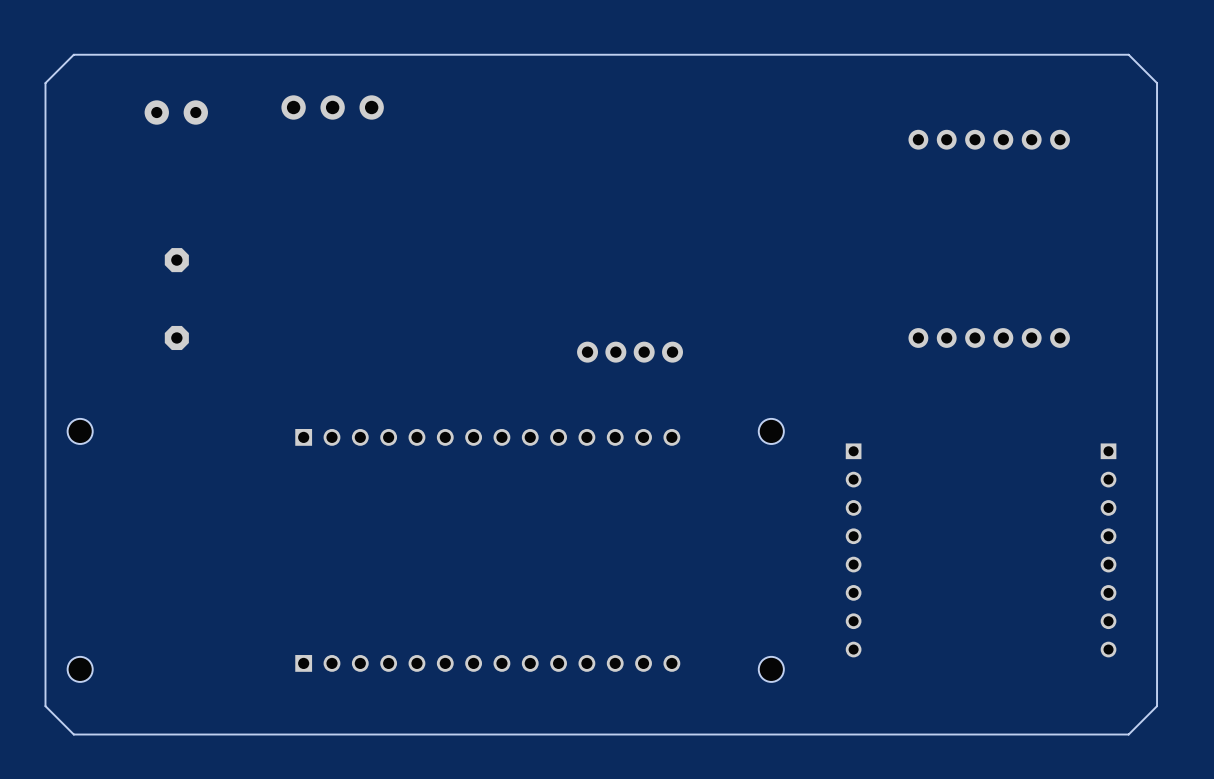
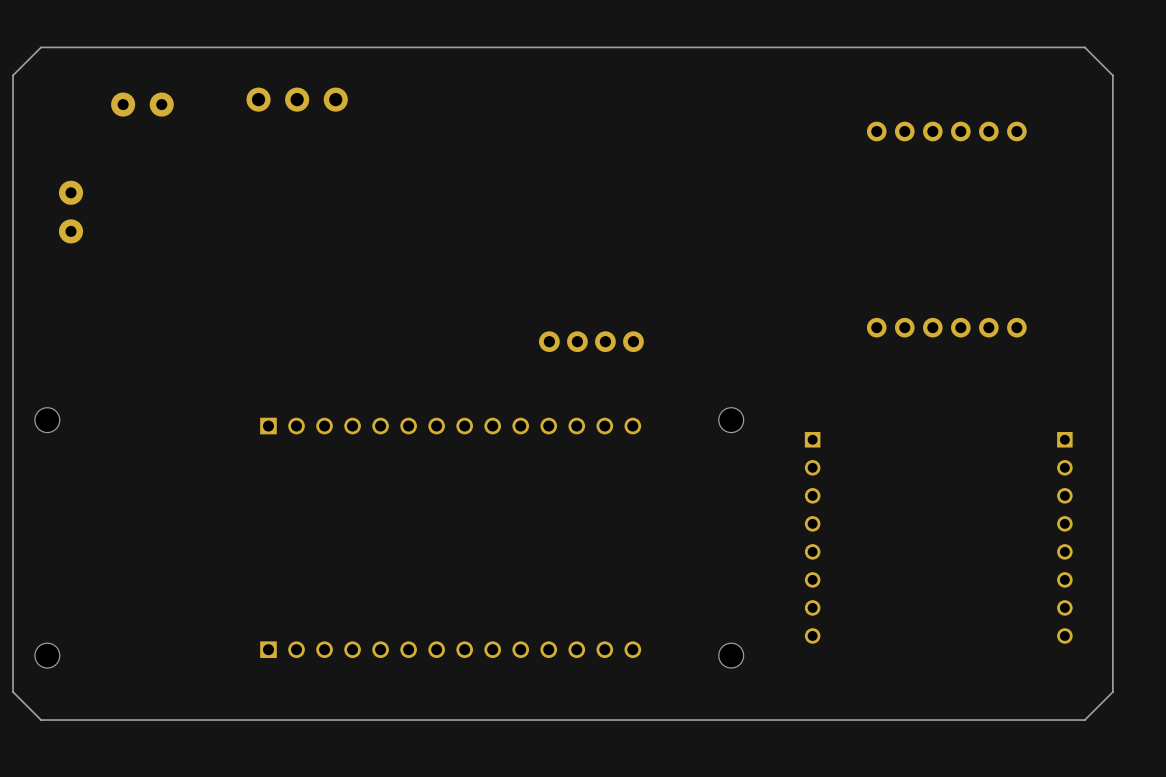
part: none -> (71, 212)
part: (176, 260) -> none
part: (176, 337) -> none

